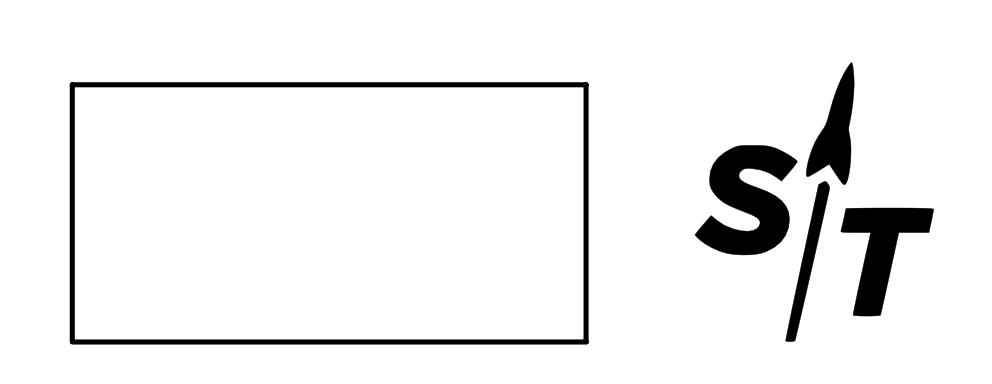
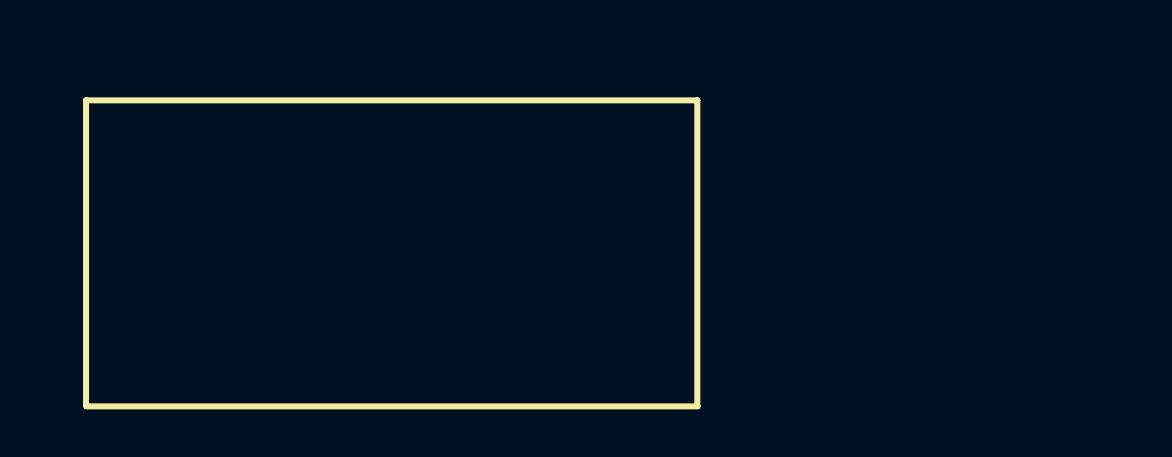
drawing: [694, 62, 934, 342] -> none

